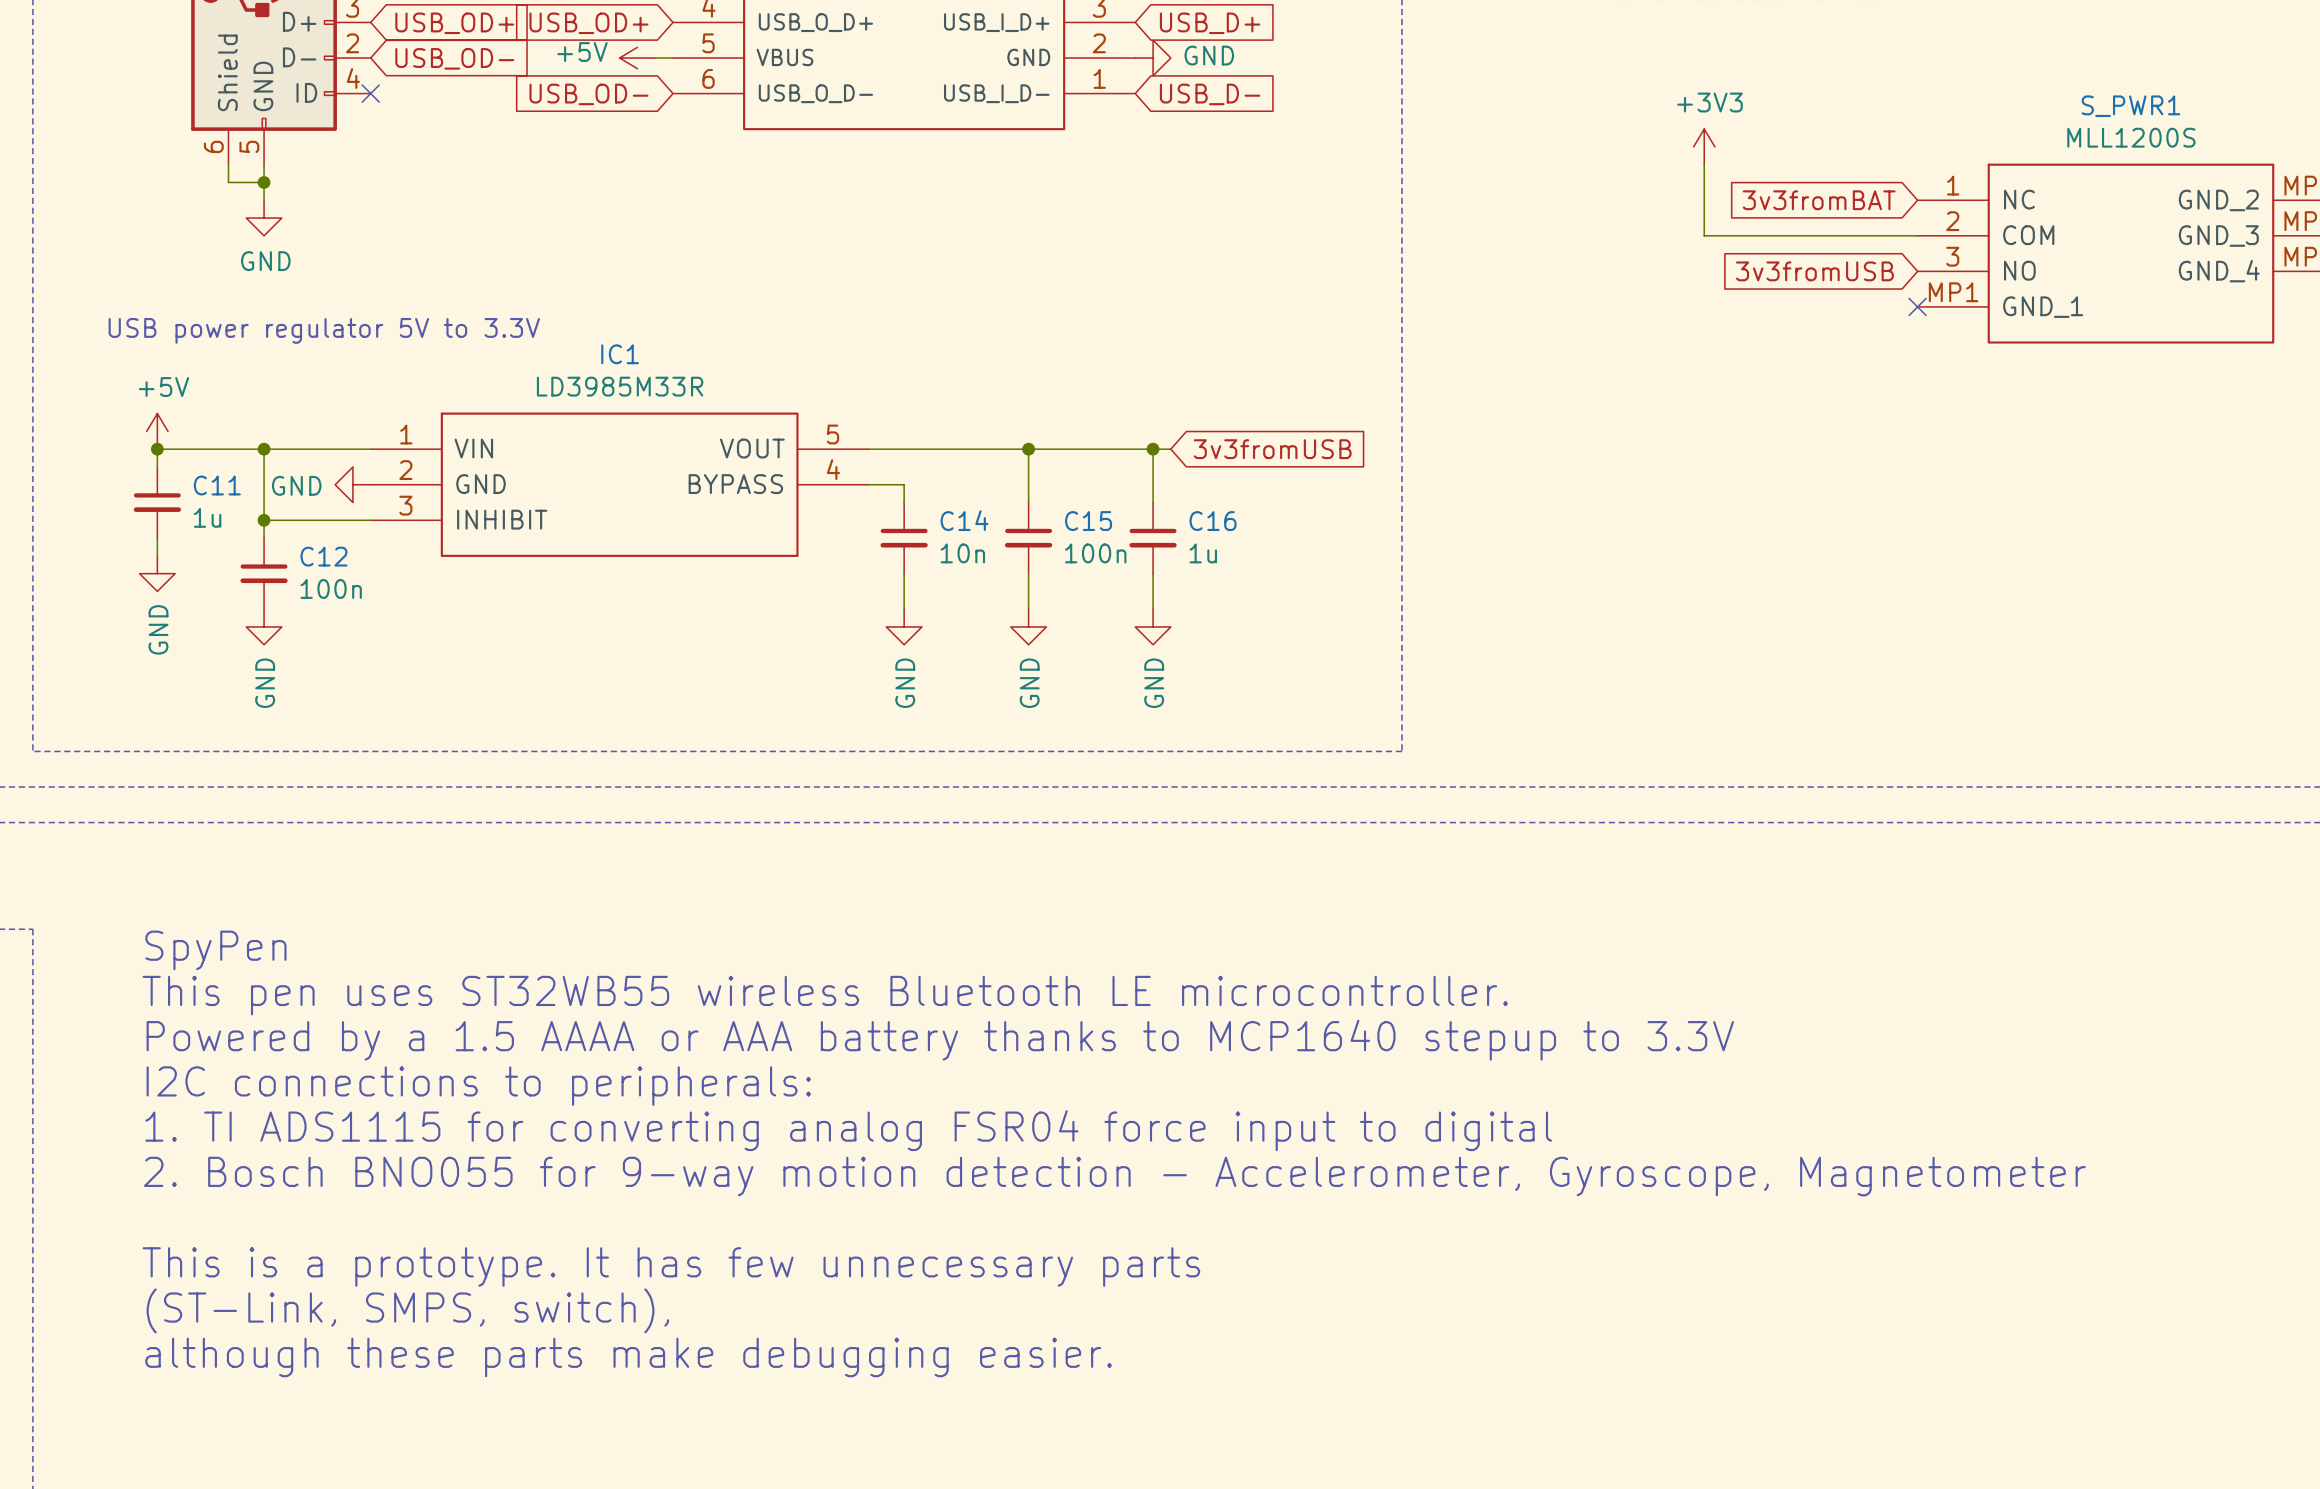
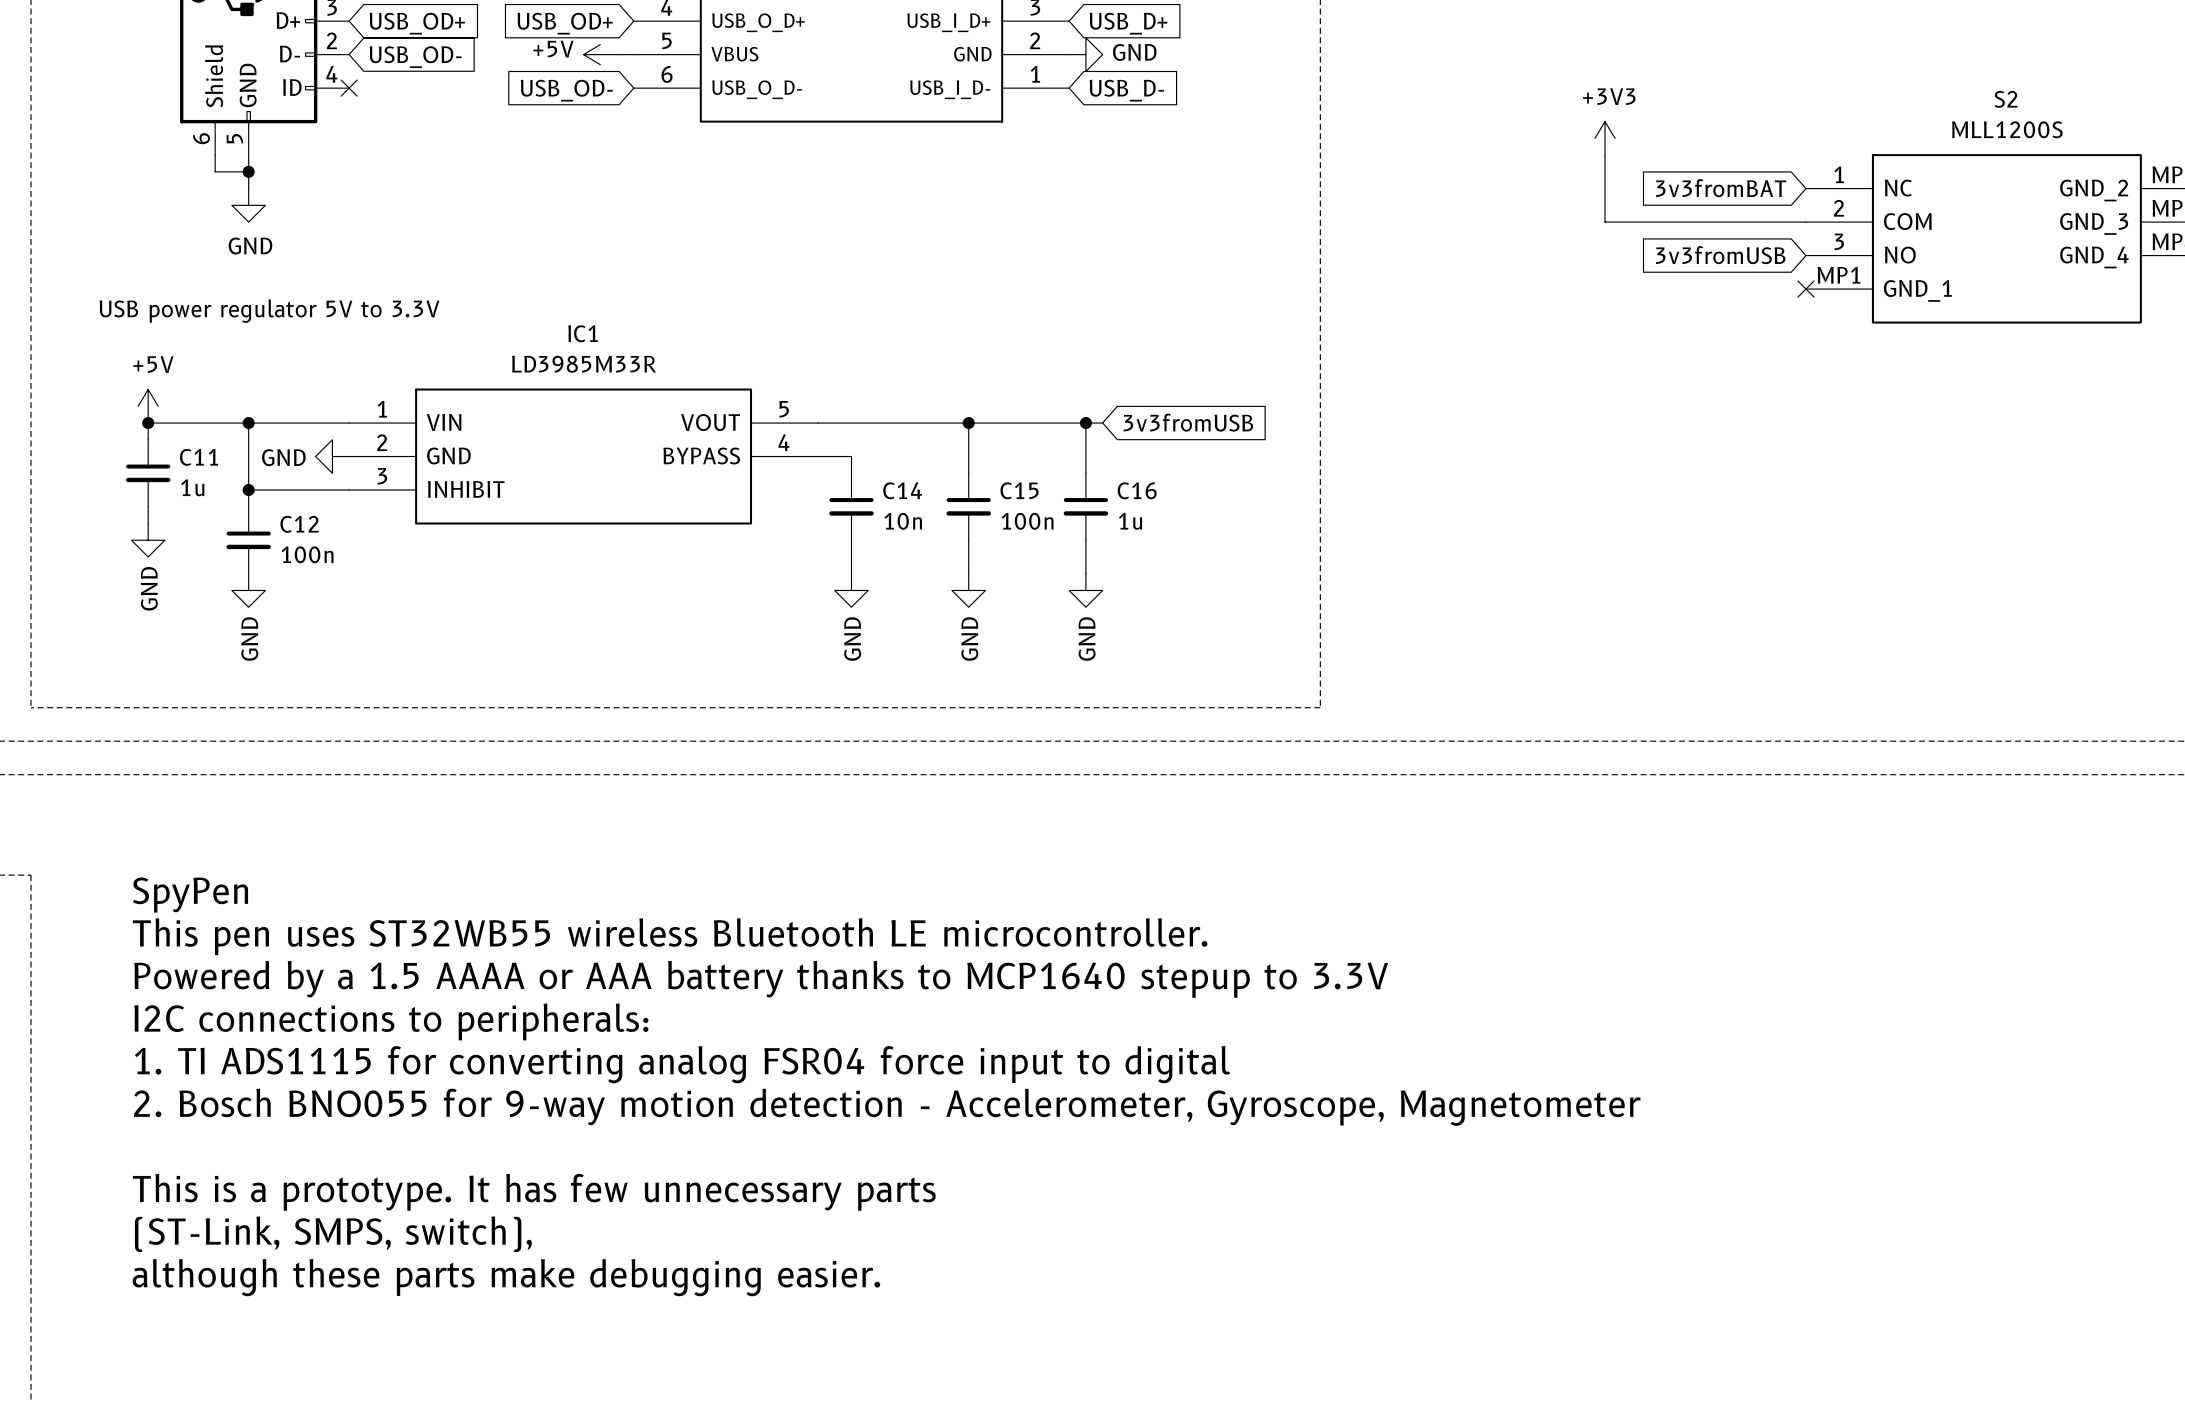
S_PWR1 name: S_PWR1 (2130, 106) -> S2 (2006, 99)

